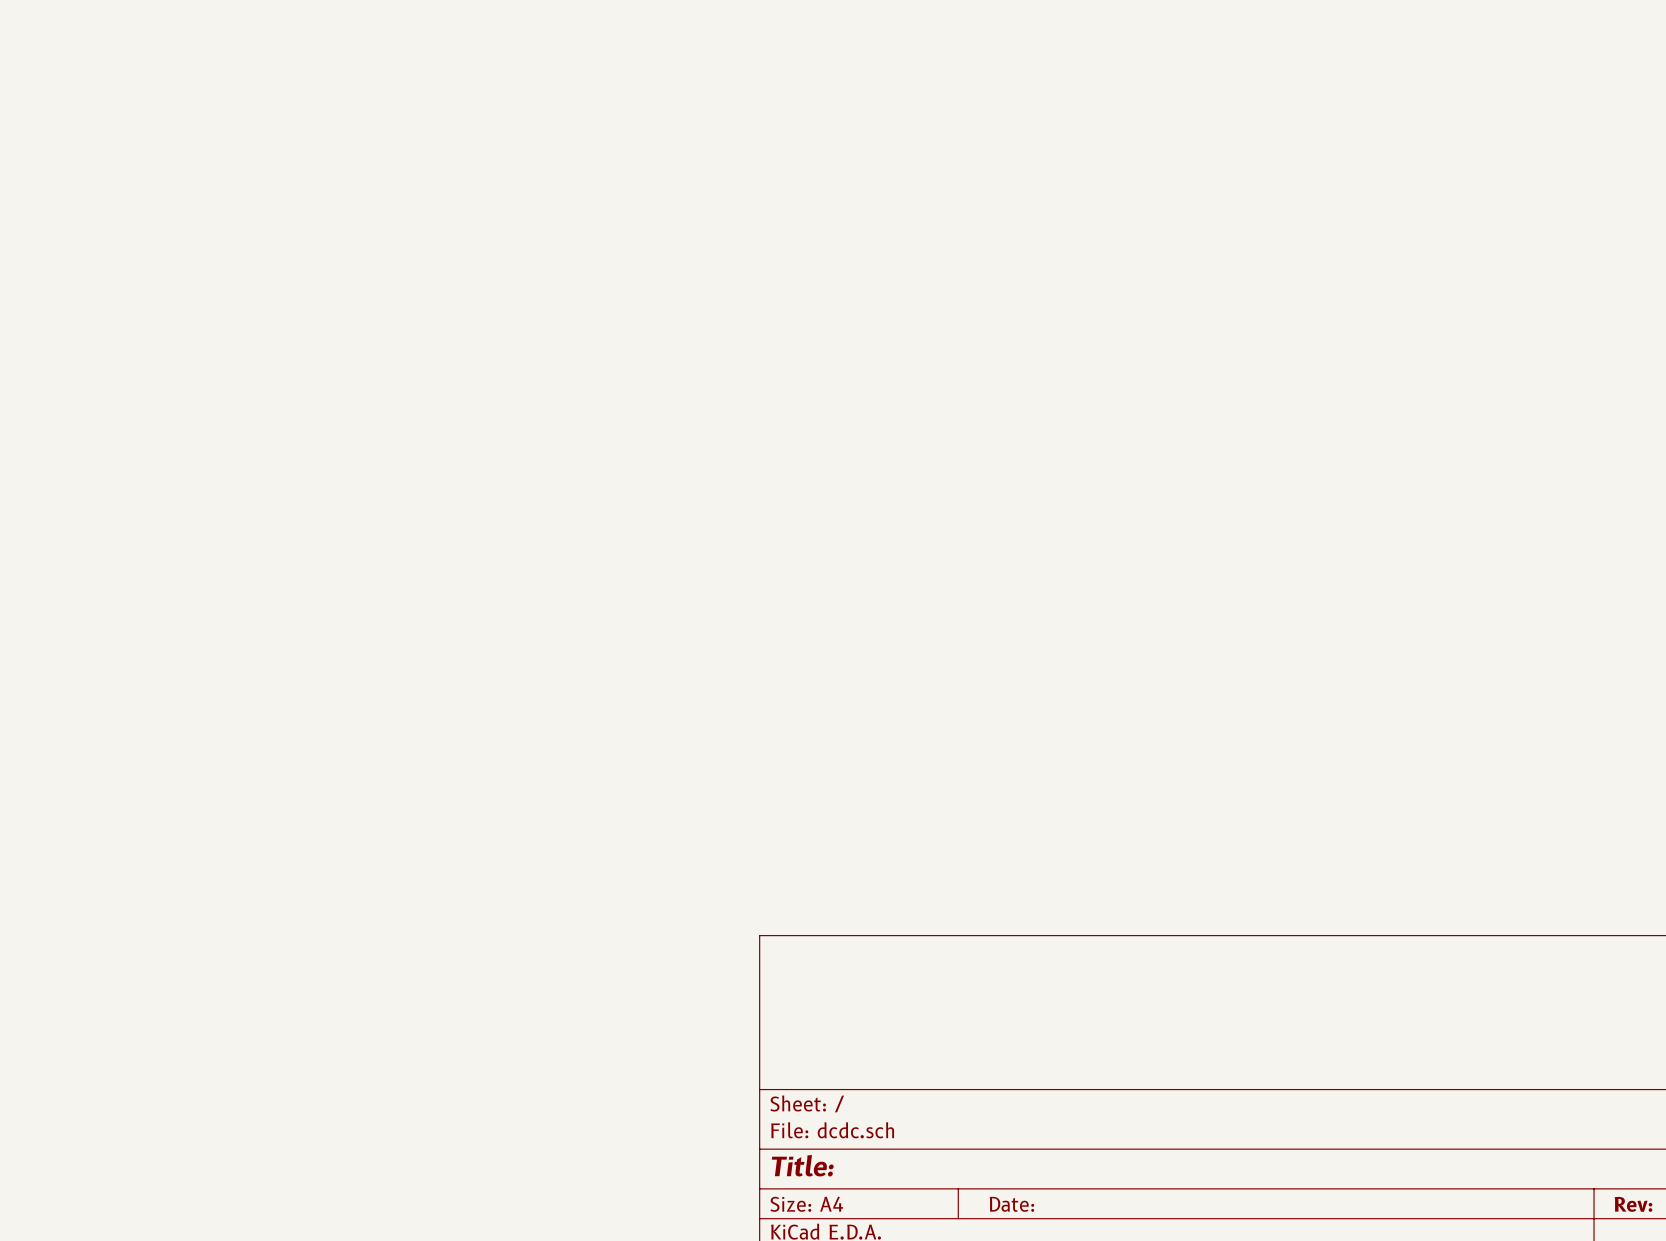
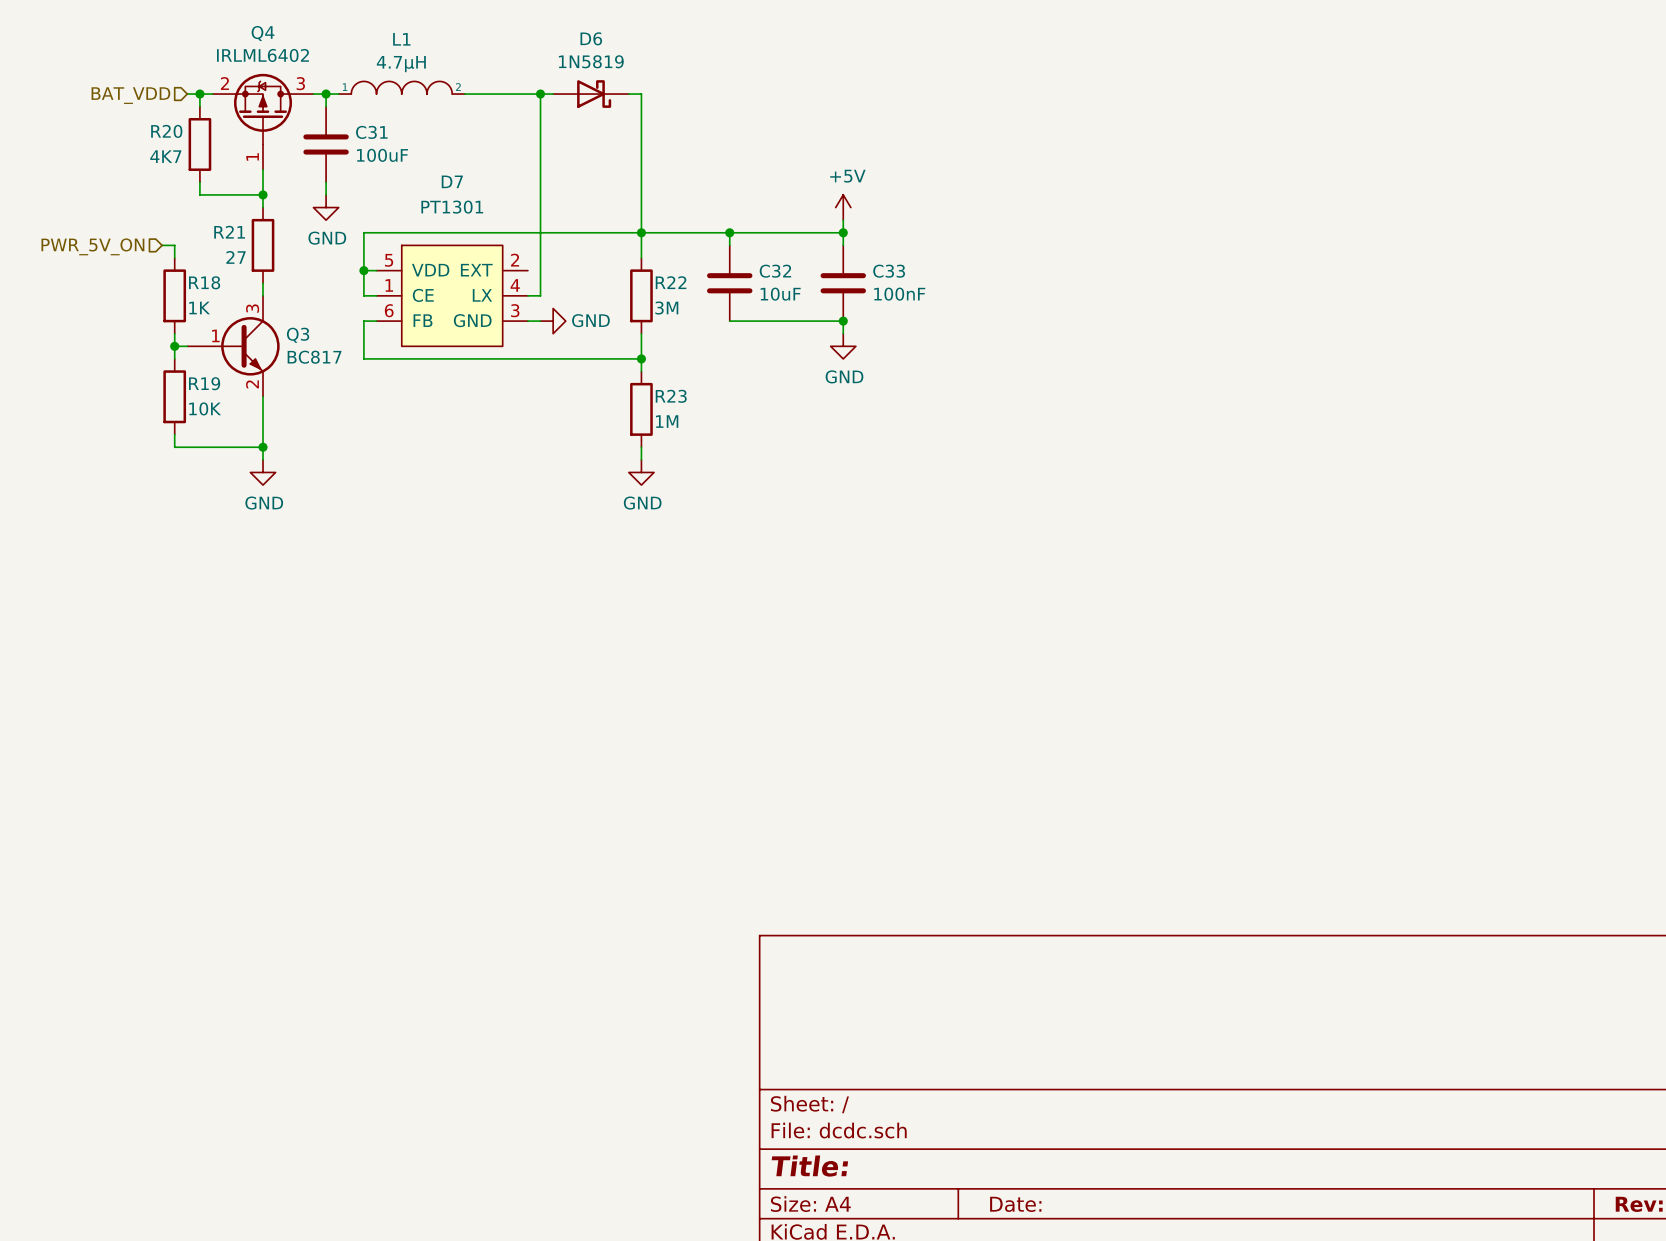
L1: none -> 4.7µH (401, 87)
wire: none -> (187, 94) (212, 94)
wire: none -> (199, 94) (199, 106)
junction: none -> (199, 94)
wire: none -> (313, 94) (338, 94)
wire: none -> (326, 94) (326, 106)
junction: none -> (326, 94)
wire: none -> (464, 94) (553, 94)
wire: none -> (540, 94) (540, 295) (527, 295)
junction: none -> (540, 94)
D6: none -> 1N5819 (590, 94)
wire: none -> (628, 94) (641, 94) (641, 258)
hierarchical label: none -> BAT_VDD (130, 95)
Q4: none -> IRLML6402 (263, 121)
R20: none -> 4K7 (199, 144)
C31: none -> 100uF (326, 144)
wire: none -> (263, 169) (263, 207)
wire: none -> (199, 182) (199, 194) (263, 194)
wire: none -> (326, 182) (326, 194)
junction: none -> (263, 194)
power symbol: none -> GND (326, 207)
power symbol: none -> +5V (843, 207)
wire: none -> (843, 220) (843, 245)
junction: none -> (641, 232)
wire: none -> (729, 232) (729, 245)
junction: none -> (729, 232)
wire: none -> (843, 232) (363, 232) (363, 295) (376, 295)
junction: none -> (843, 232)
wire: none -> (162, 245) (174, 245) (174, 258)
R21: none -> 27 (263, 245)
hierarchical label: none -> PWR_5V_ON (92, 246)
wire: none -> (363, 270) (376, 270)
junction: none -> (363, 270)
wire: none -> (263, 283) (263, 295)
C32: none -> 10uF (729, 283)
C33: none -> 100nF (843, 283)
R18: none -> 1K (174, 295)
D7: none -> PT1301 (452, 295)
R22: none -> 3M (641, 295)
wire: none -> (376, 321) (363, 321) (363, 358) (641, 358)
wire: none -> (527, 321) (540, 321)
power symbol: none -> GND (553, 321)
wire: none -> (729, 321) (843, 321) (843, 333)
junction: none -> (843, 321)
wire: none -> (174, 333) (174, 358)
wire: none -> (641, 333) (641, 371)
wire: none -> (174, 346) (187, 346)
junction: none -> (174, 346)
Q3: none -> BC817 (233, 346)
power symbol: none -> GND (843, 346)
junction: none -> (641, 358)
R19: none -> 10K (174, 396)
wire: none -> (263, 396) (263, 459)
R23: none -> 1M (641, 409)
wire: none -> (174, 434) (174, 447) (263, 447)
junction: none -> (263, 447)
wire: none -> (641, 447) (641, 459)
power symbol: none -> GND (263, 472)
power symbol: none -> GND (641, 472)

